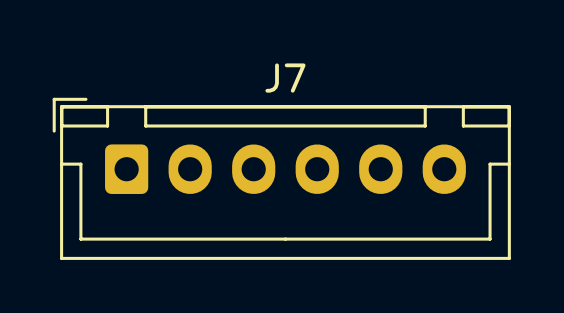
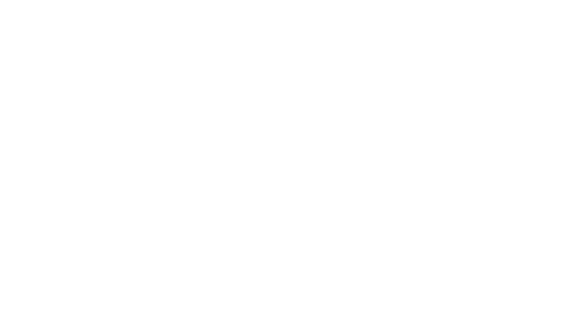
J7: (281, 178) -> none

